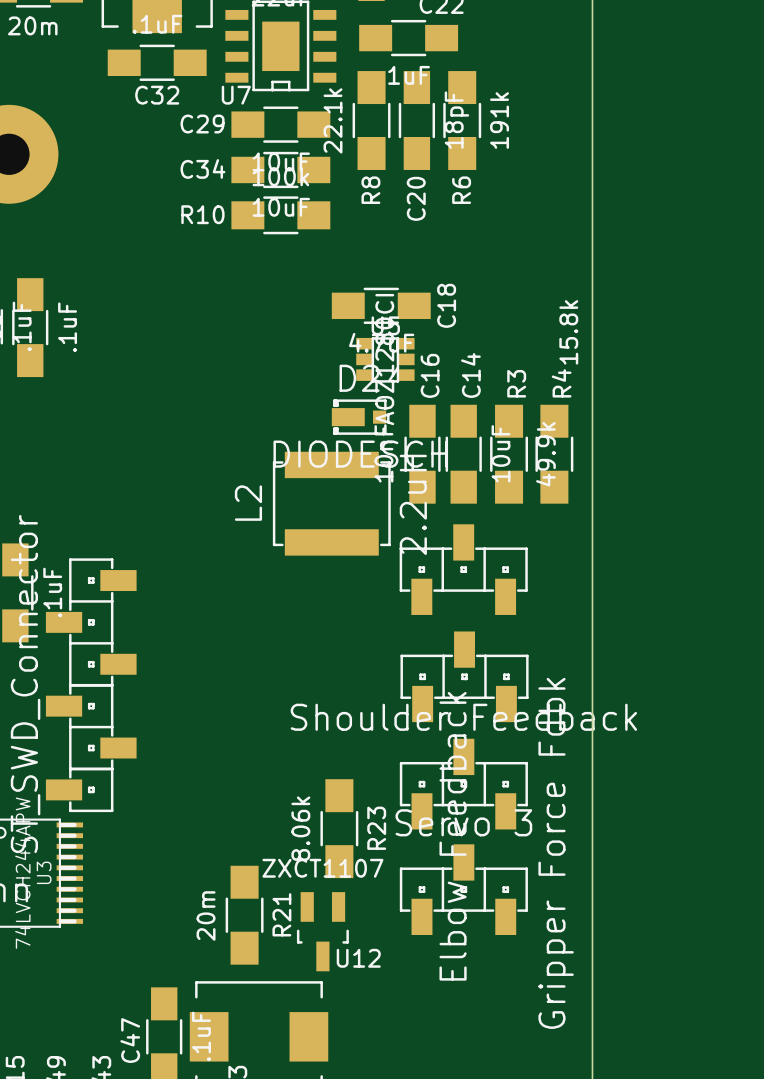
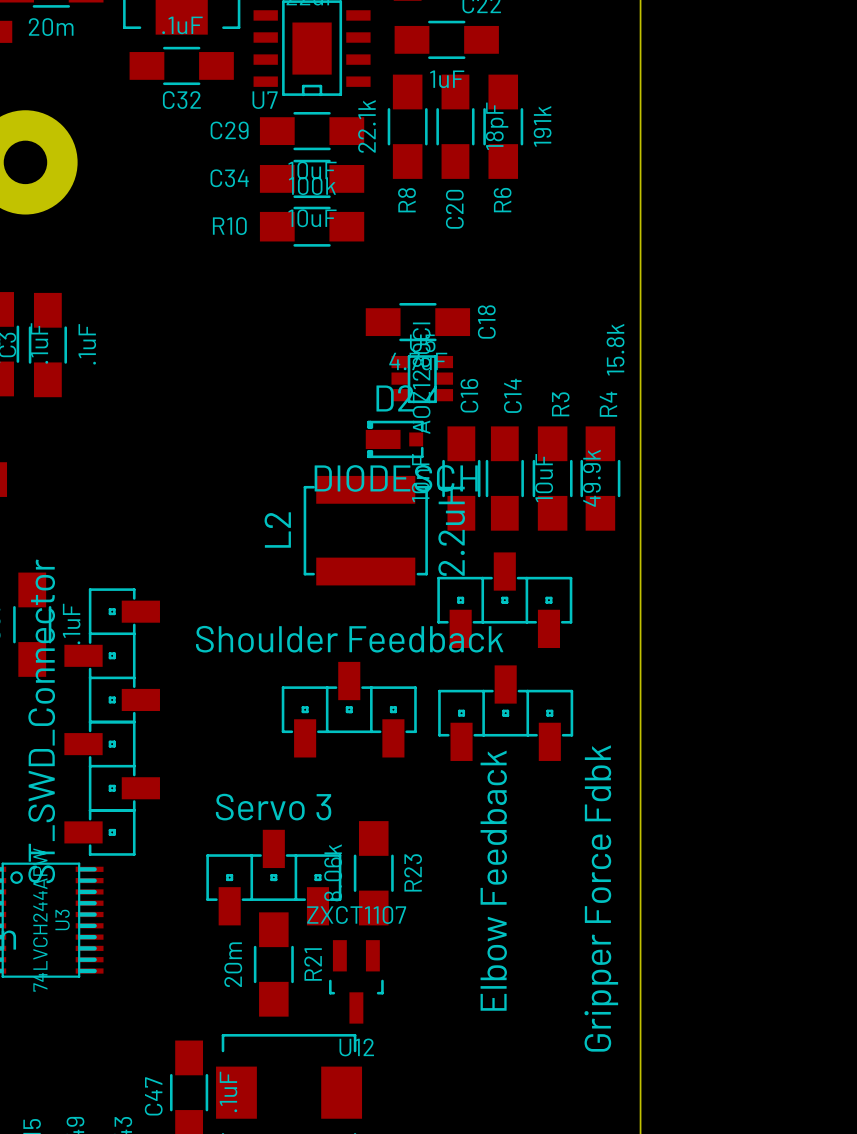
part position: (463, 784) -> (349, 709)
part position: (463, 889) -> (273, 877)
U12 name position: U12 (358, 958) -> U12 (356, 1047)

